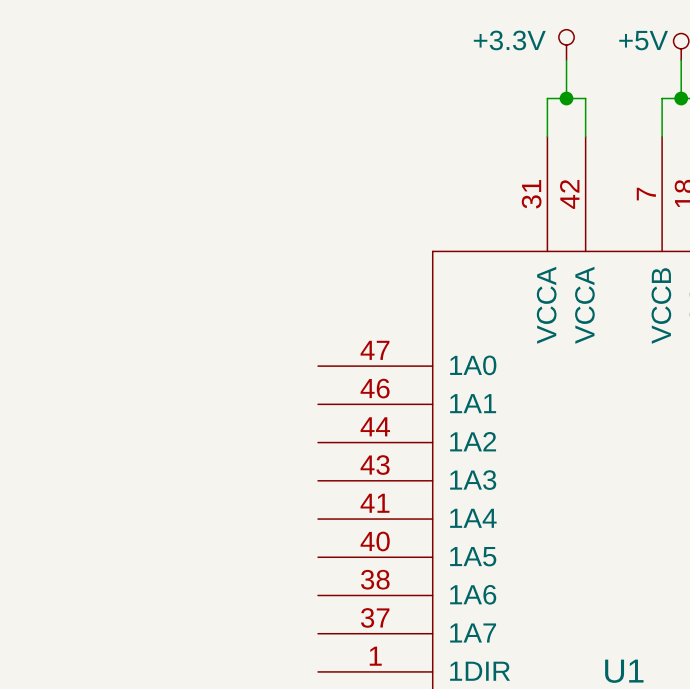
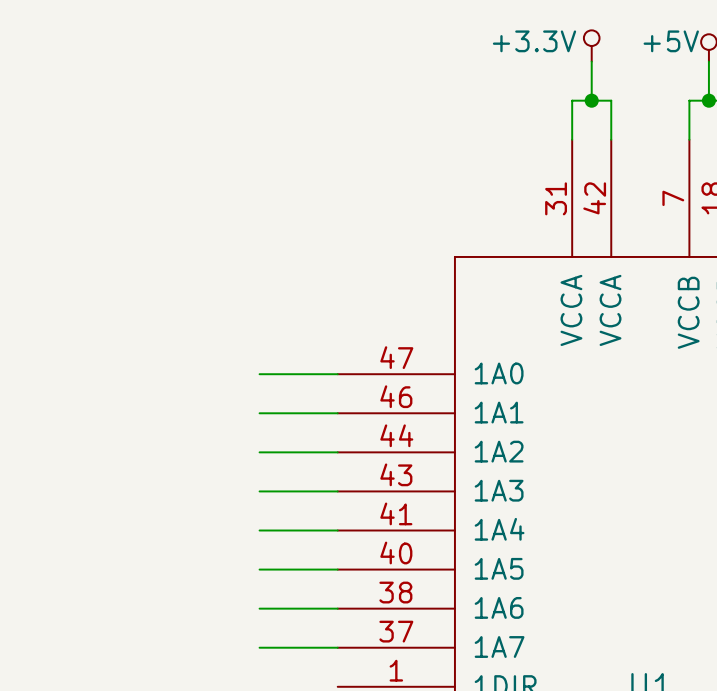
wire: none -> (259, 374) (337, 374)
wire: none -> (259, 413) (337, 413)
wire: none -> (259, 452) (337, 452)
wire: none -> (259, 491) (337, 491)
wire: none -> (259, 530) (337, 530)
wire: none -> (259, 569) (337, 569)
wire: none -> (259, 608) (337, 608)
wire: none -> (259, 647) (337, 647)

